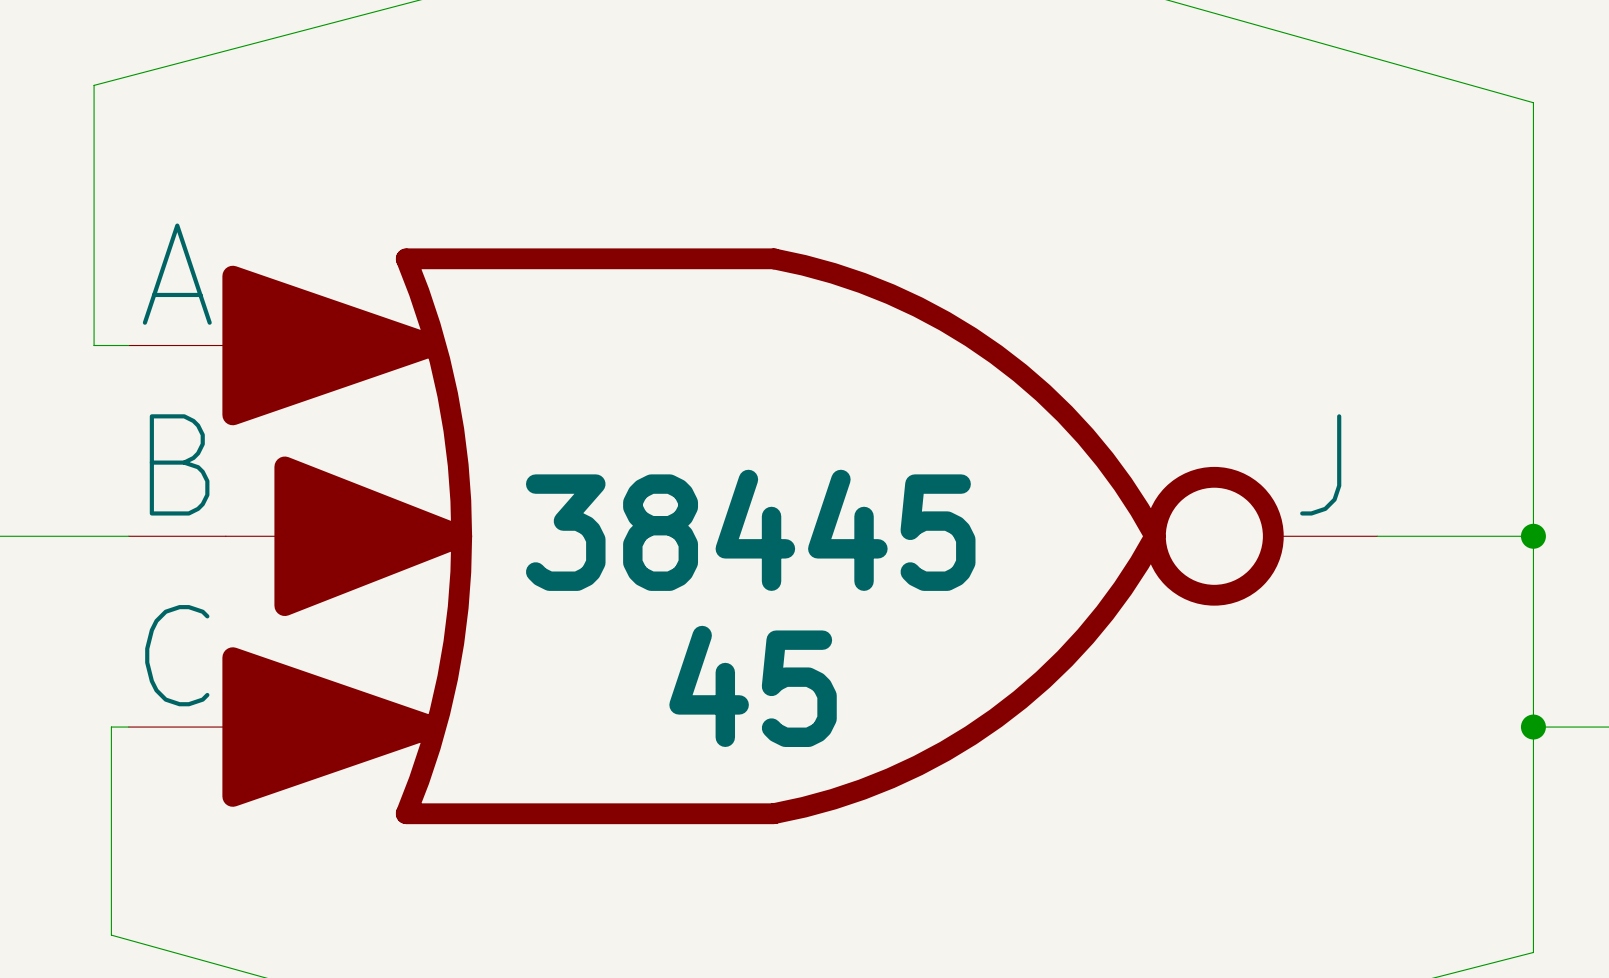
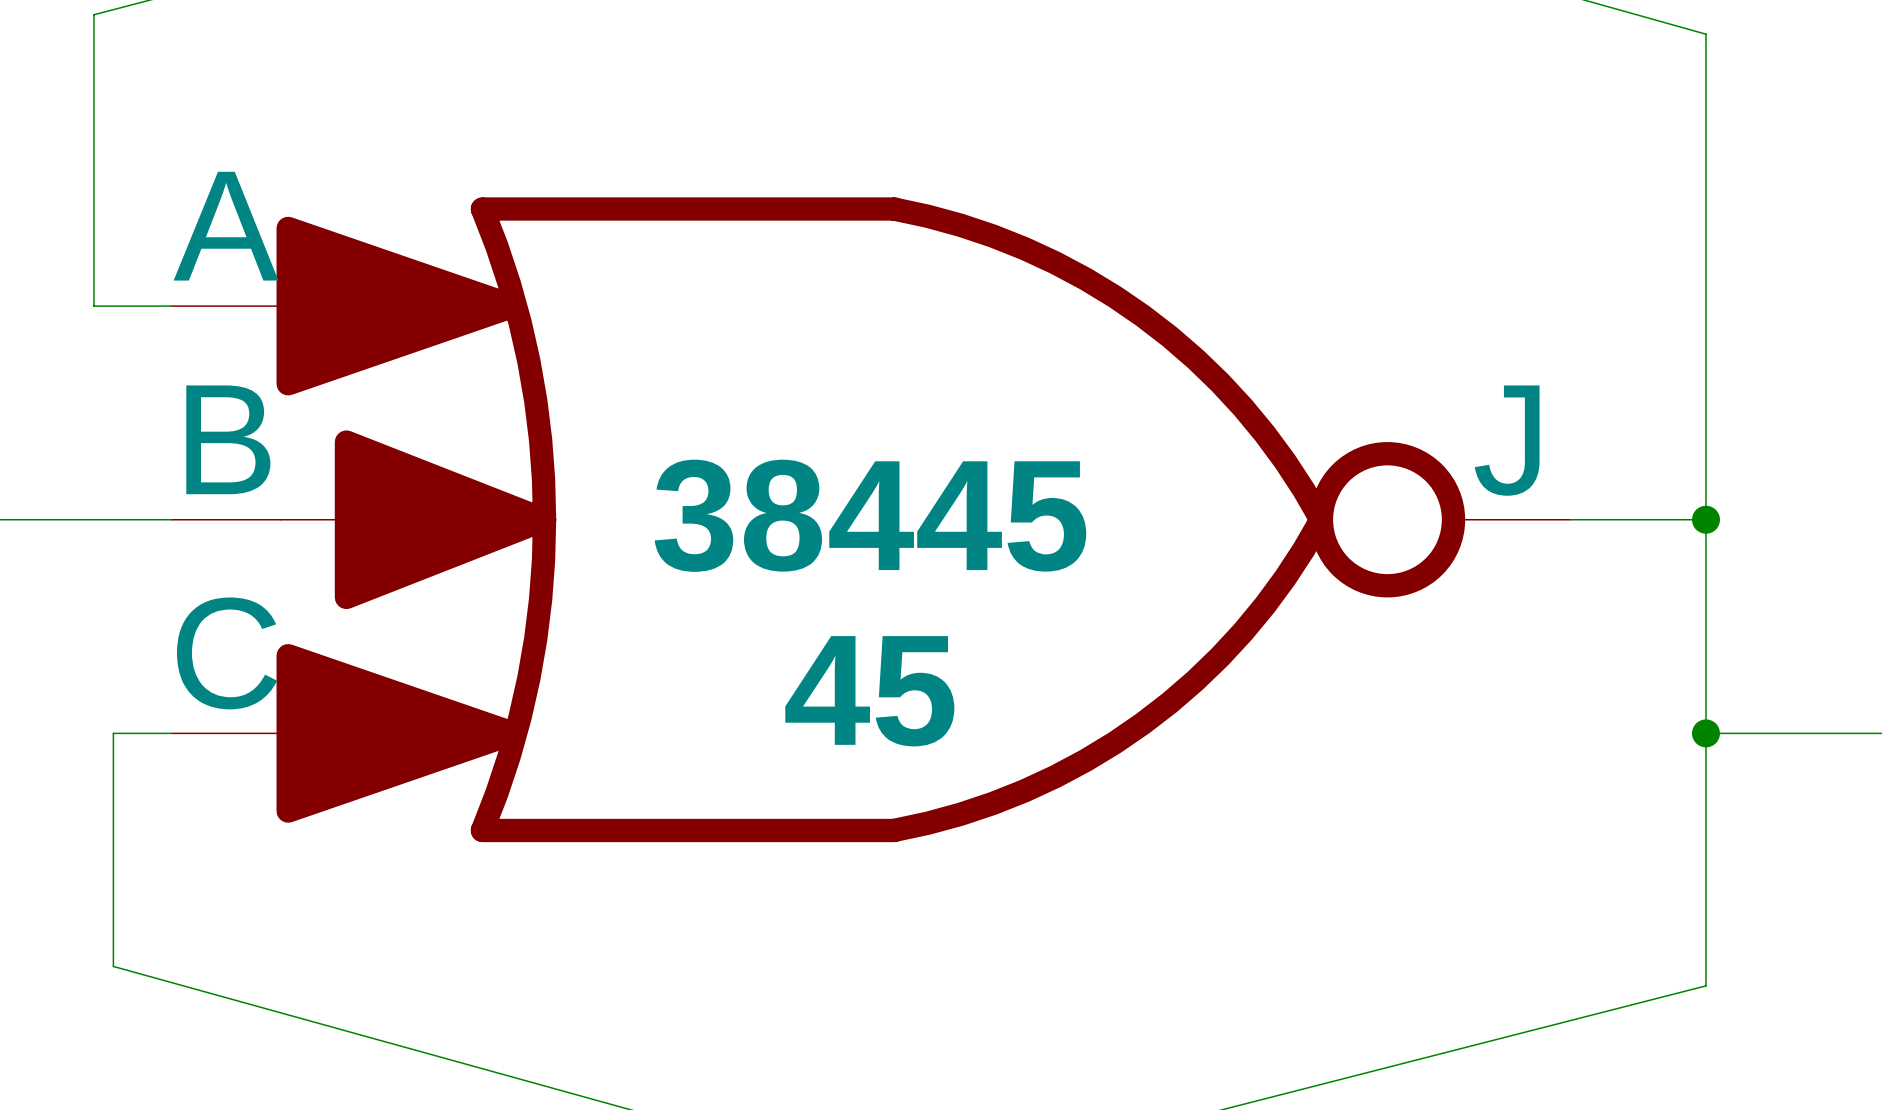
part position: (753, 536) -> (870, 519)

